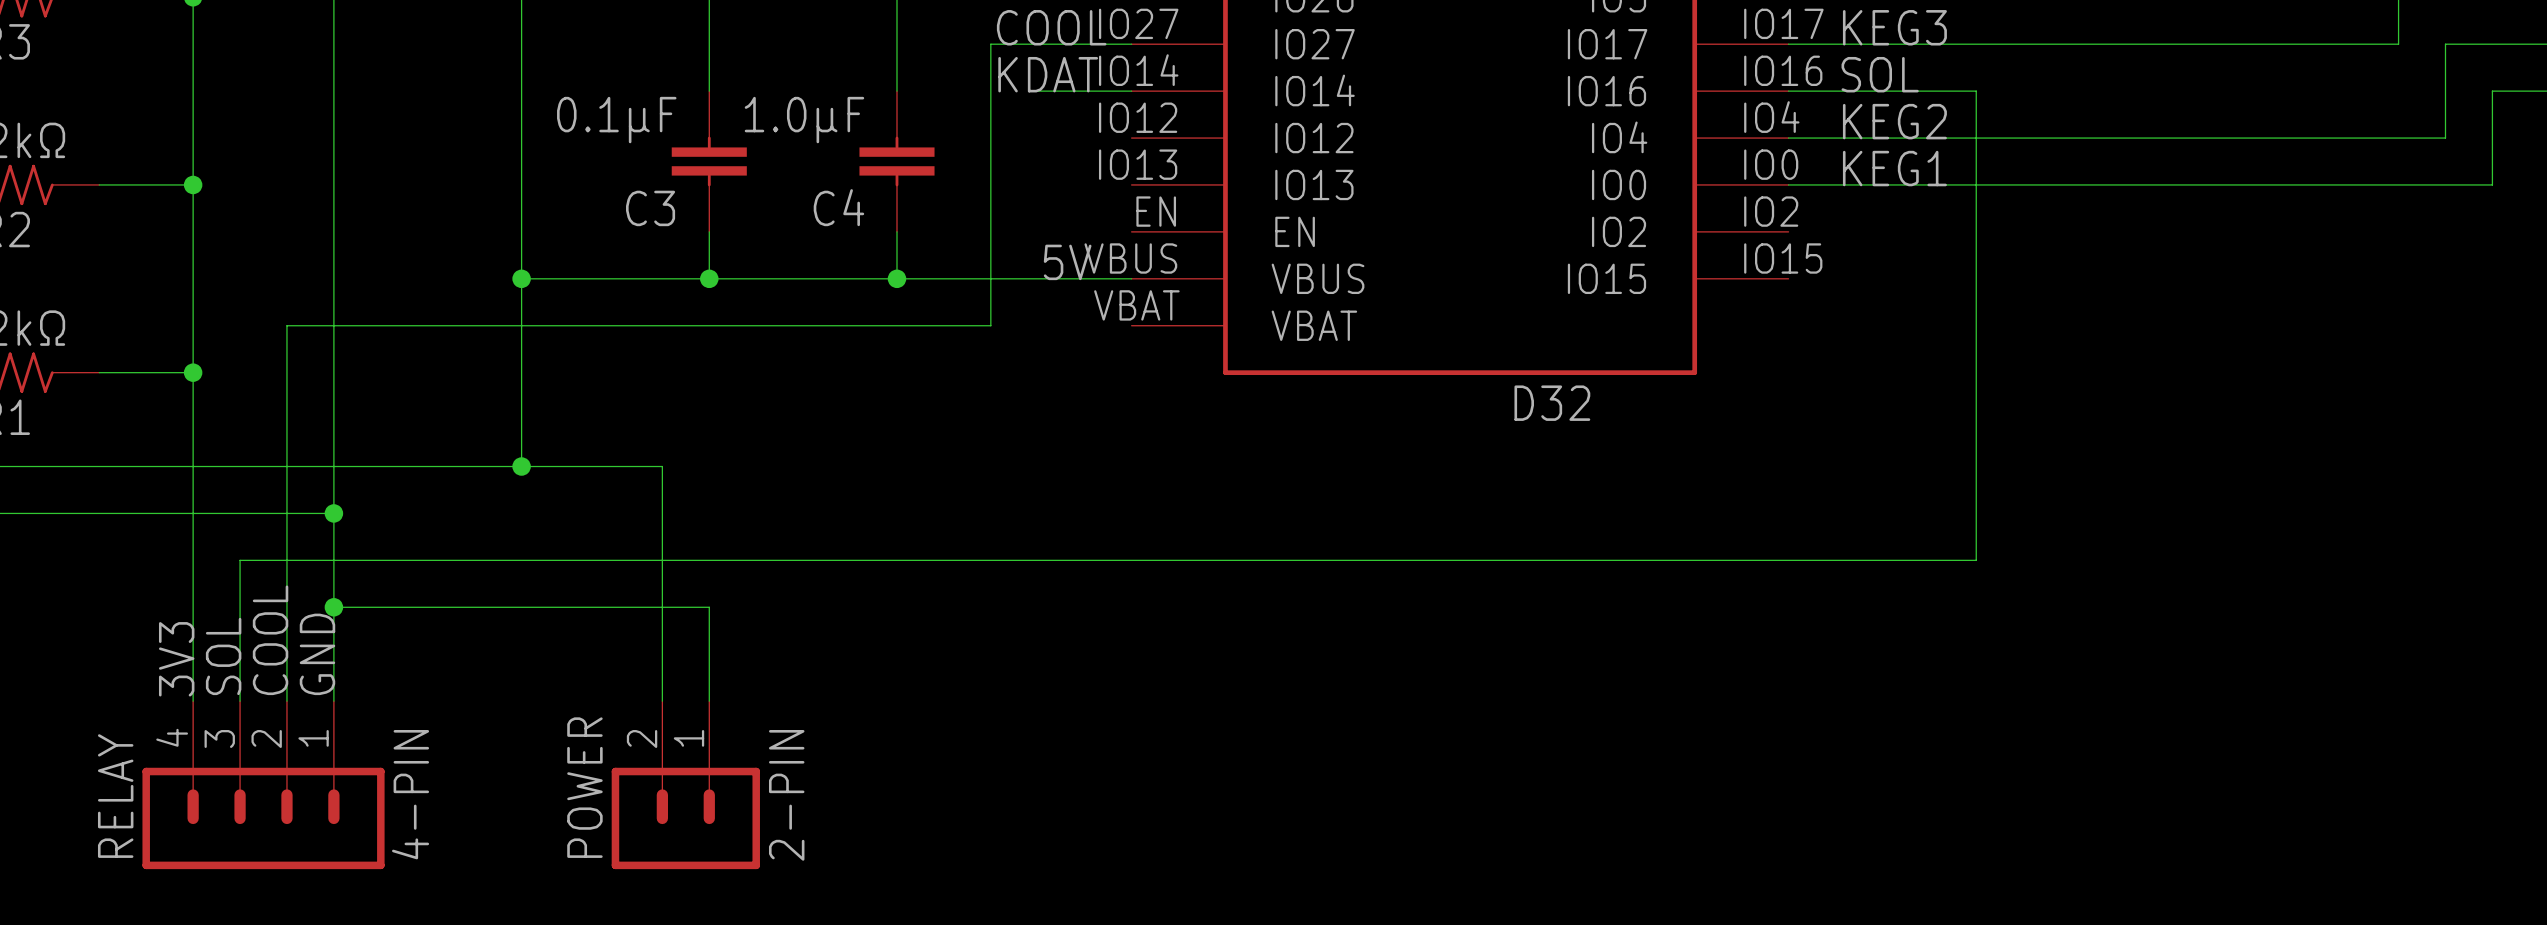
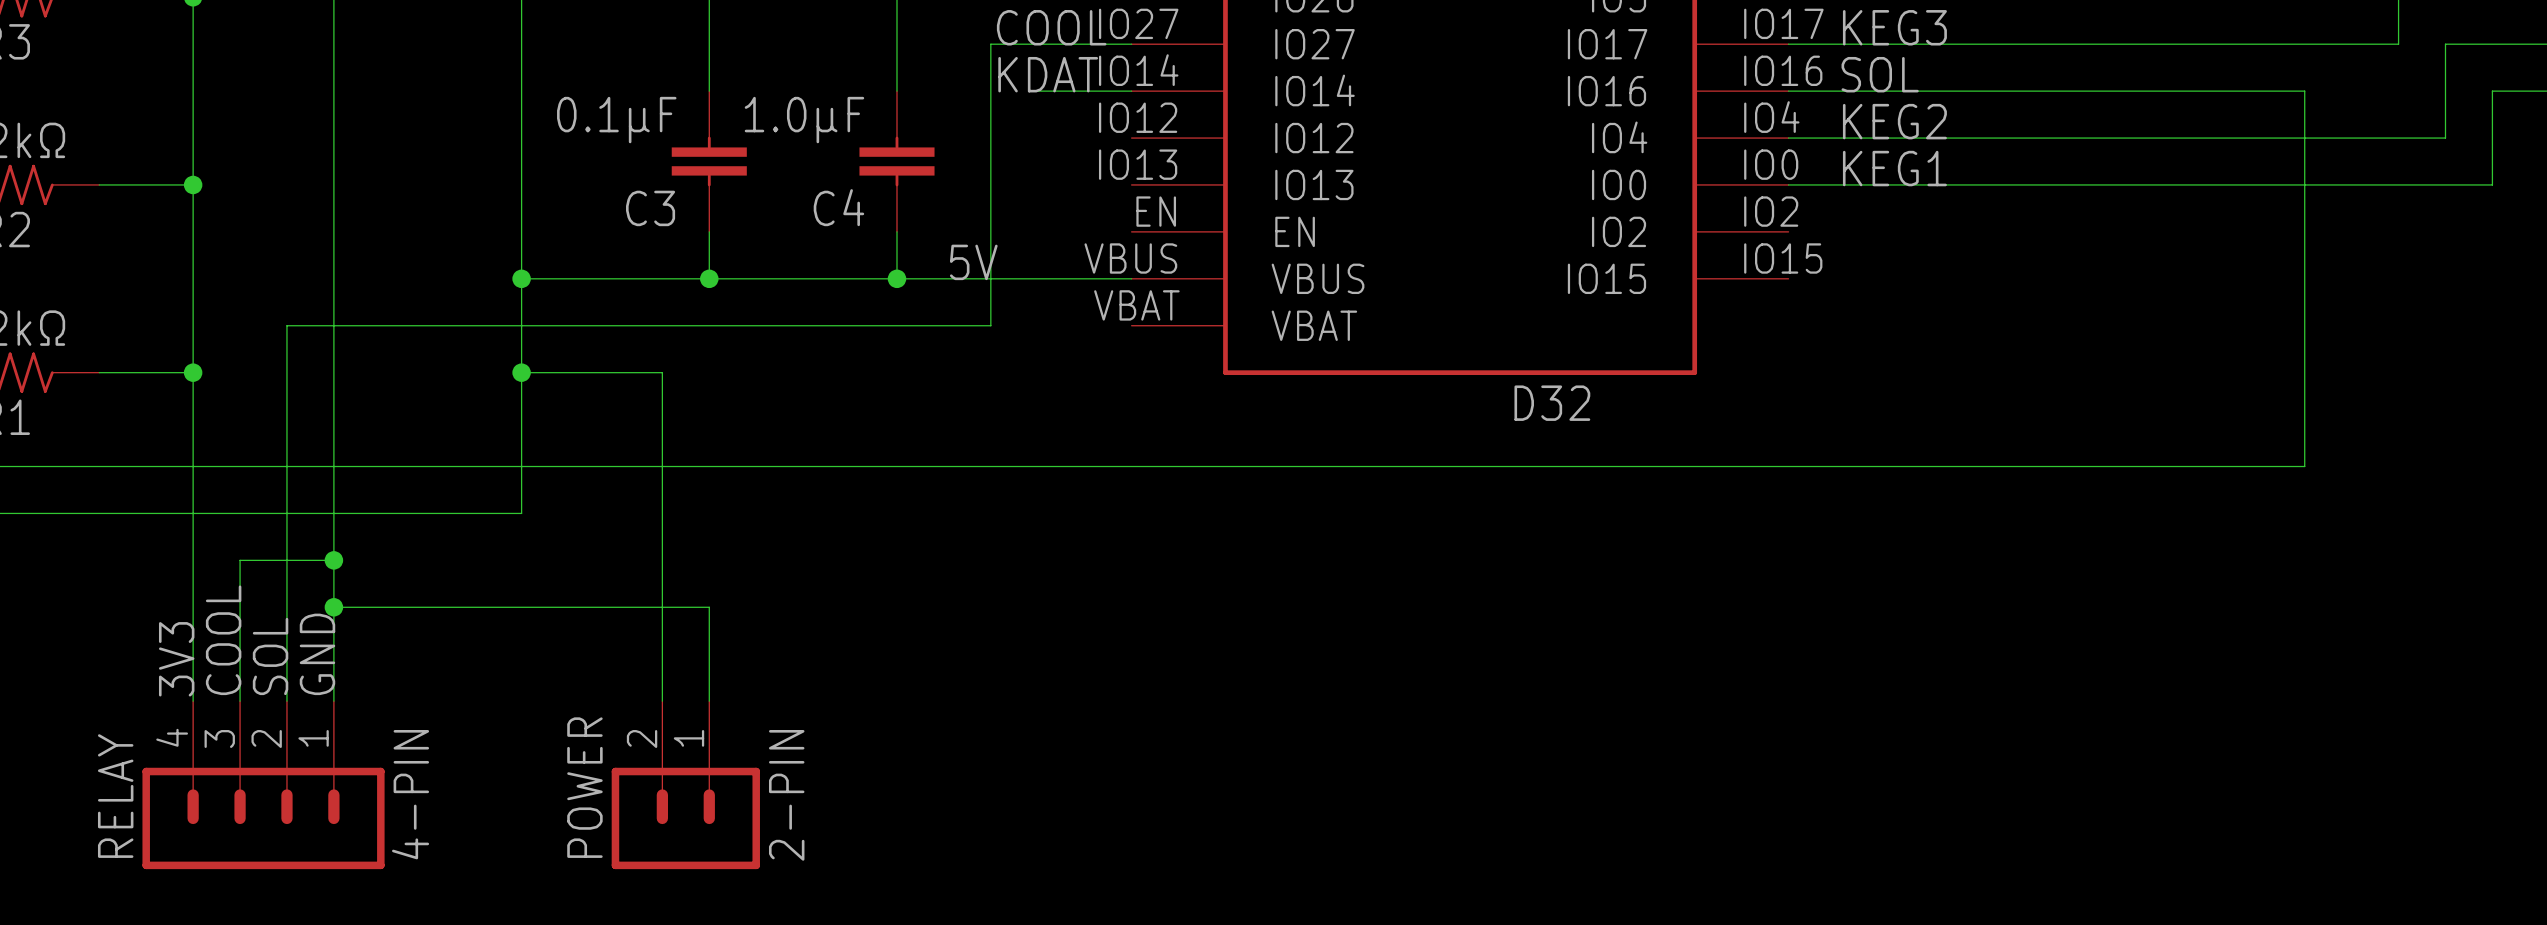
wire: (1976, 91) (1976, 560) (333, 560) -> (1976, 91) (2304, 91) (2304, 466) (662, 466) (662, 372) (521, 372)
label position: 5V (1067, 262) -> 5V (973, 262)
wire: none -> (521, 466) (521, 513) (333, 513)
junction position: (521, 466) -> (521, 372)
junction position: (333, 513) -> (333, 560)
label: COOL (270, 640) -> SOL (270, 656)
label: SOL (223, 656) -> COOL (223, 640)

